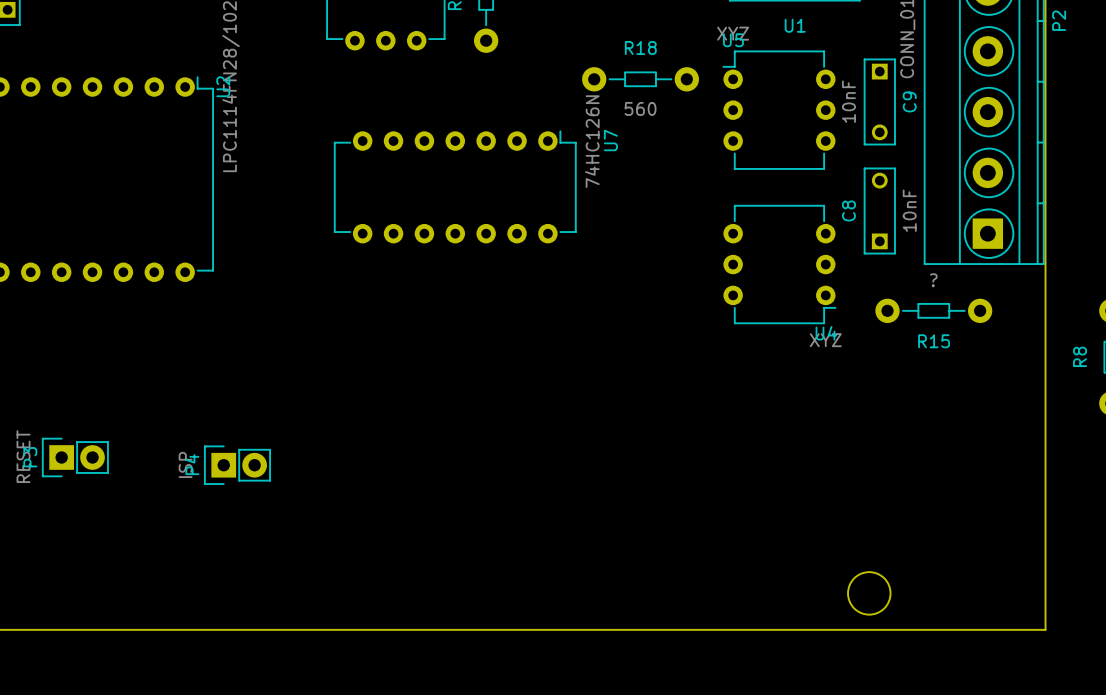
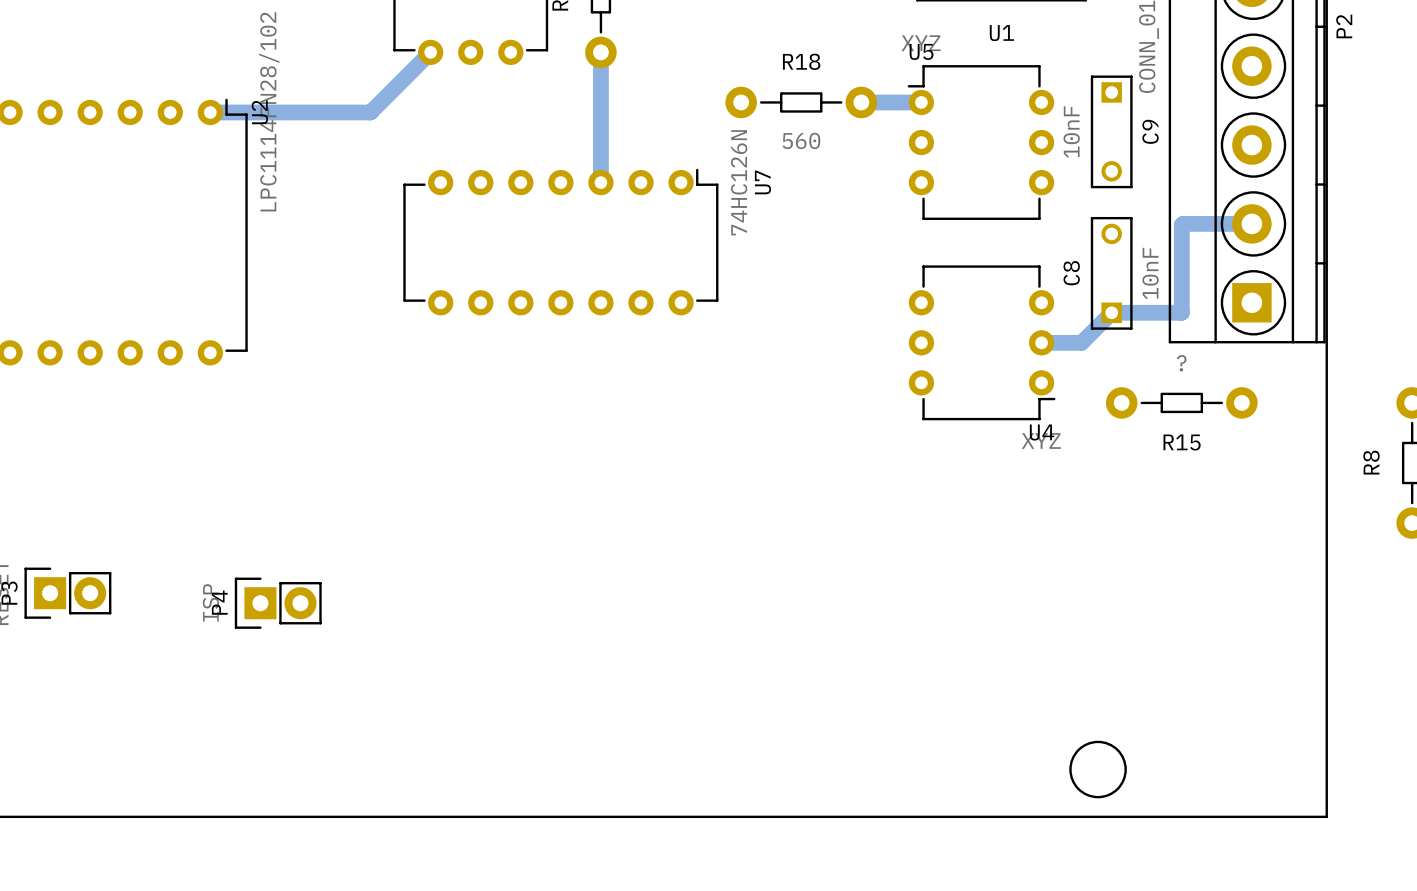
bottom track: none -> (430, 52) (370, 112) (210, 112)
bottom track: none -> (600, 52) (600, 182)
bottom track: none -> (861, 102) (921, 102)
bottom track: none -> (1251, 223) (1181, 225) (1181, 312) (1111, 312) (1081, 342) (1041, 342)

